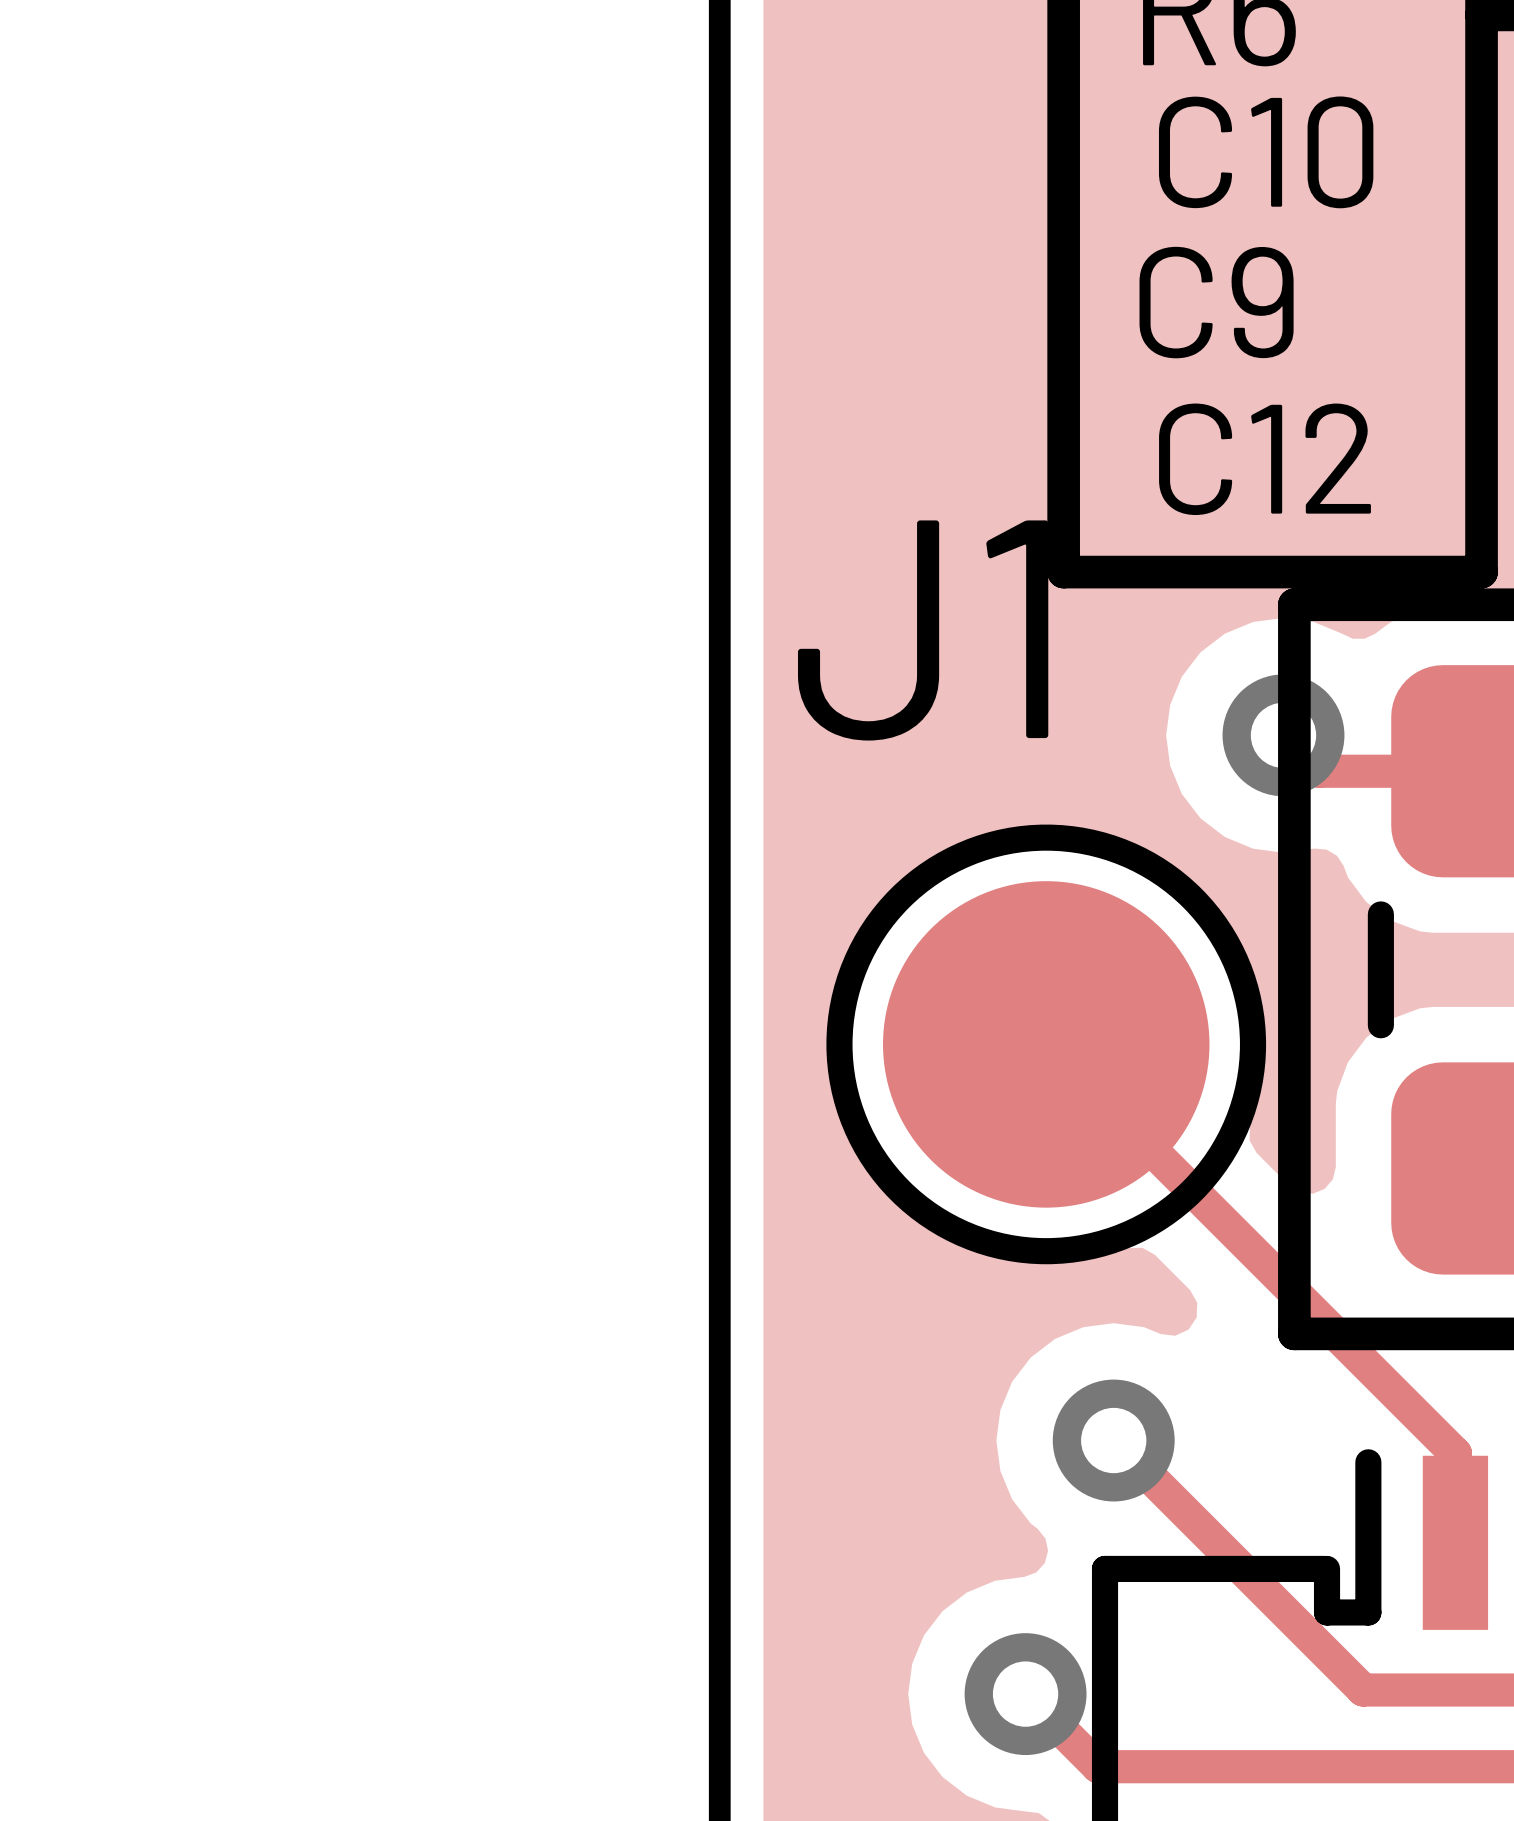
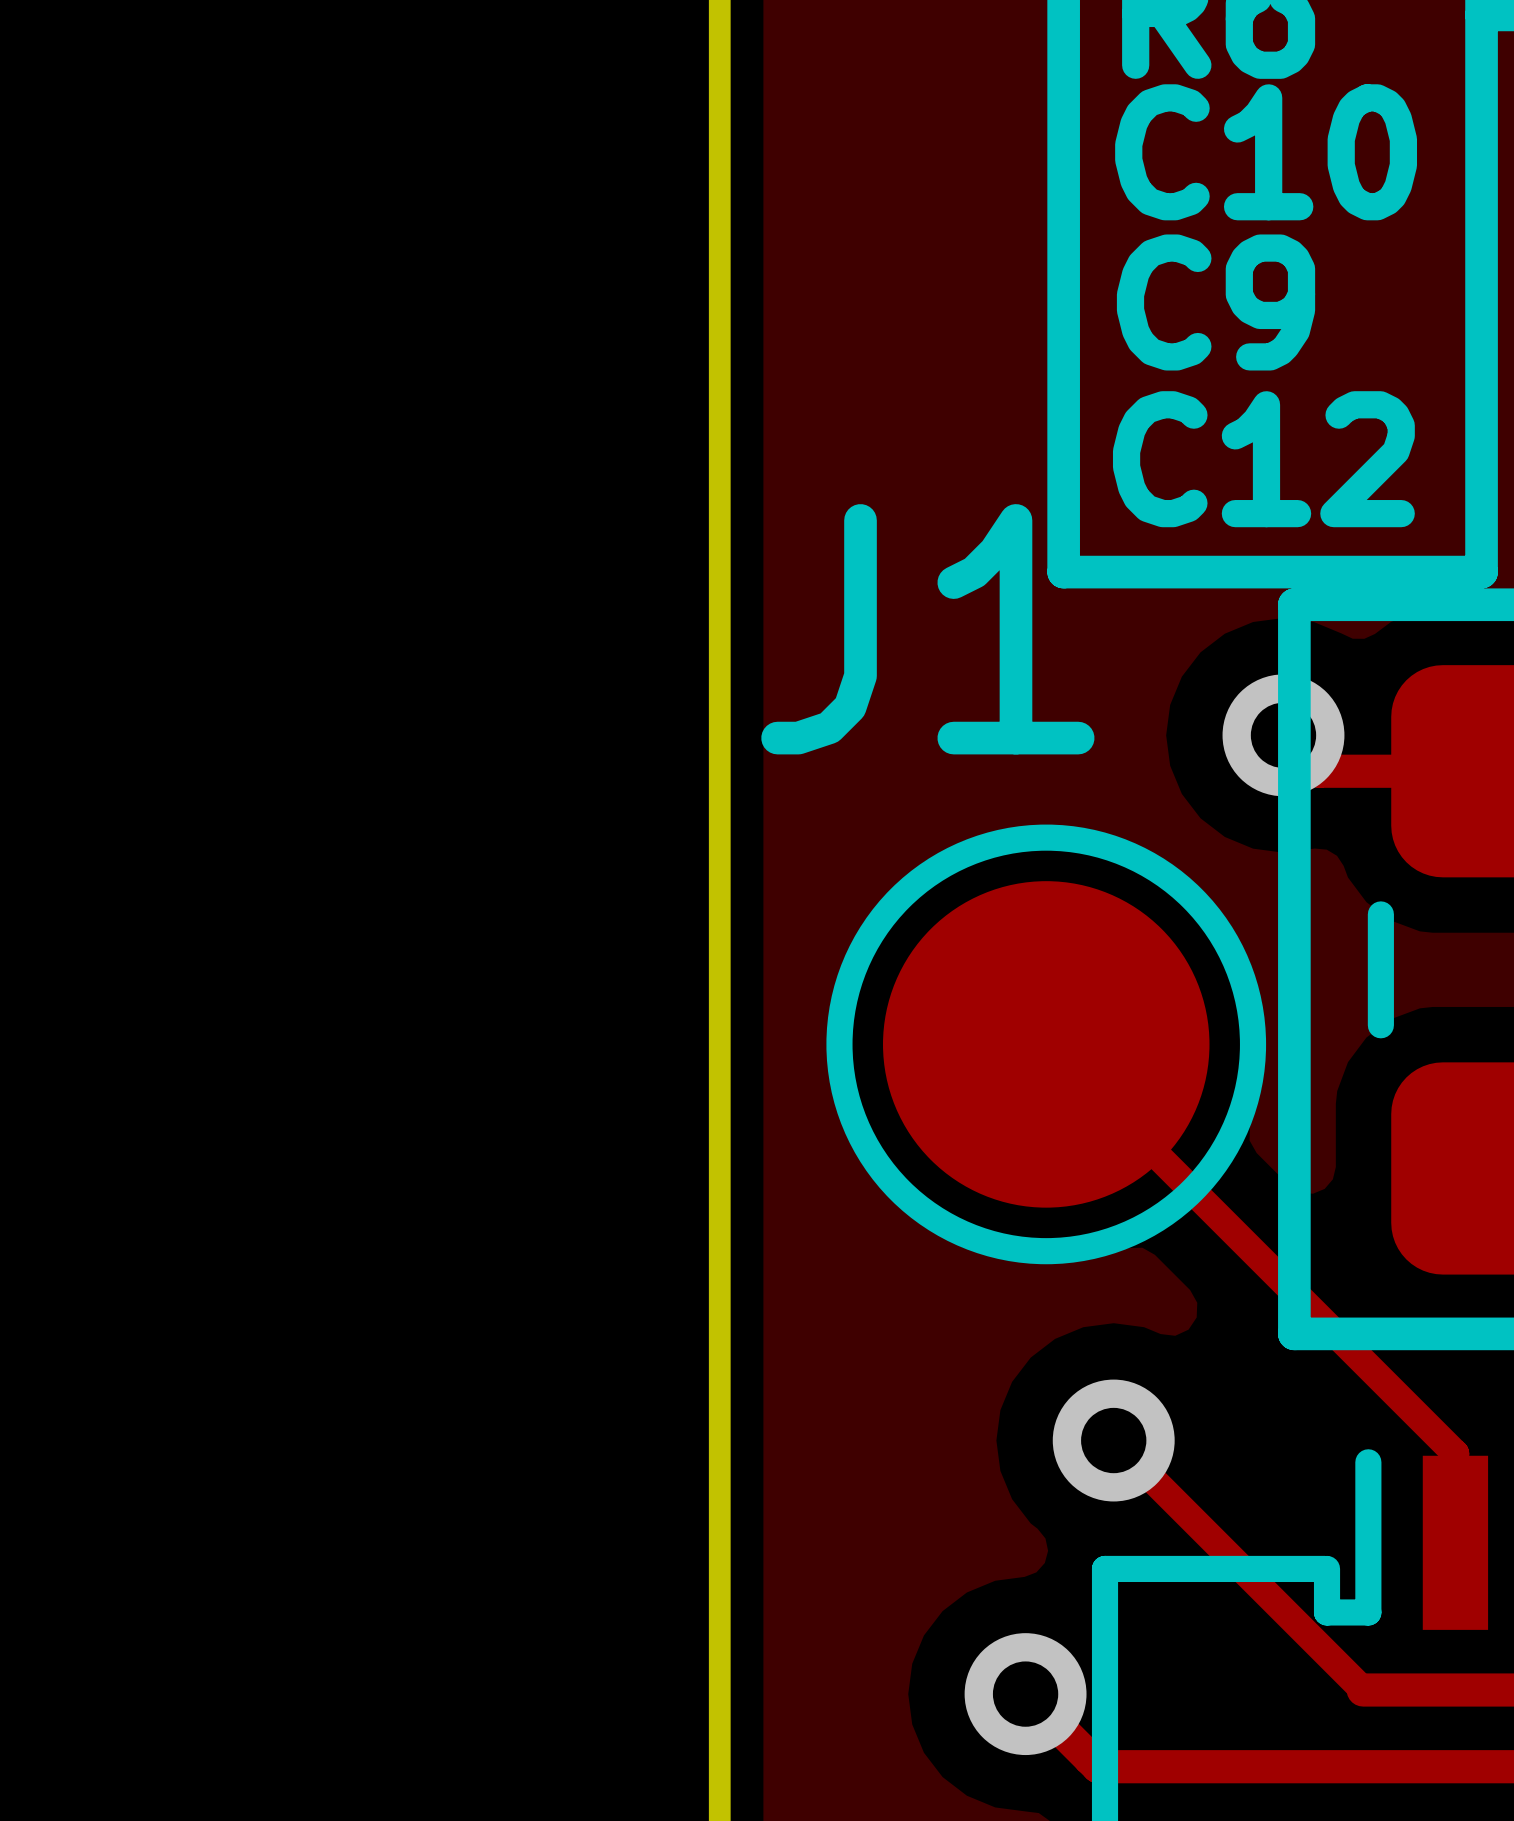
track width: thick (1046, 1044) (1455, 1453) (1455, 1542) -> thin (1046, 1044) (1455, 1453) (1455, 1542)
track width: thick (1113, 1440) (1363, 1690) -> thin (1113, 1440) (1363, 1690)

